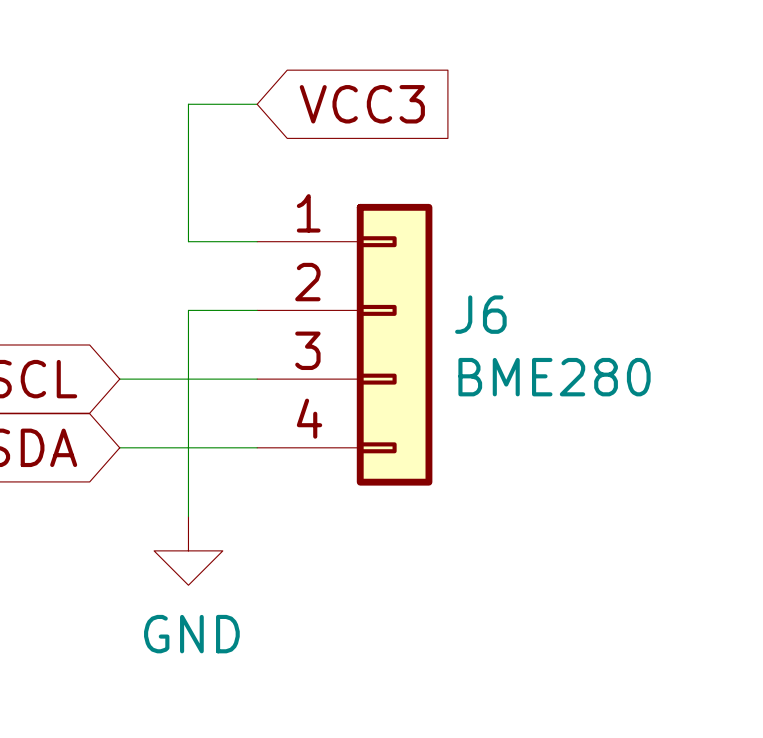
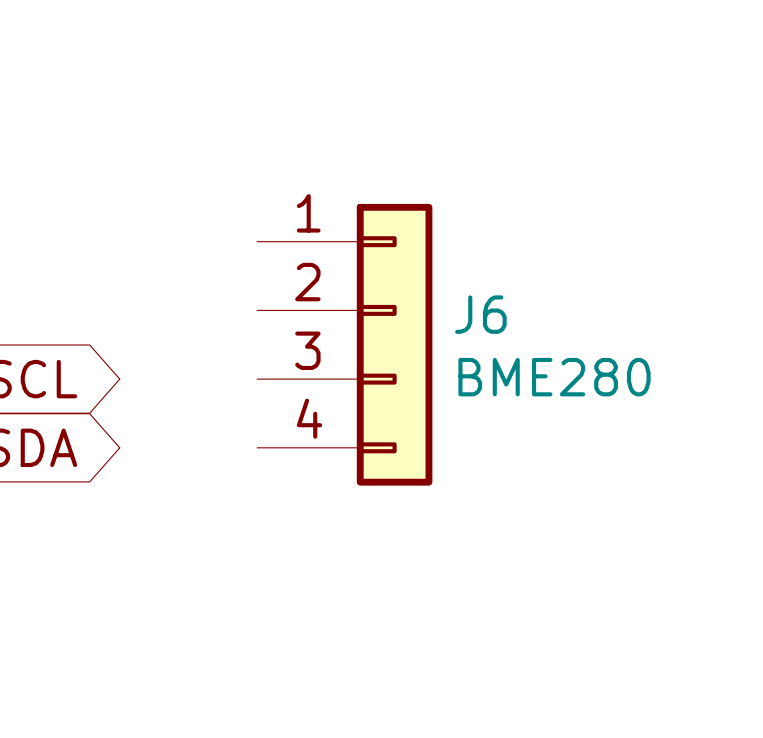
wire: (257, 104) (188, 104) (188, 241) (257, 241) -> none
global label: VCC3 (362, 104) -> none
wire: (257, 310) (188, 310) (188, 516) -> none
wire: (119, 379) (257, 379) -> none
wire: (119, 447) (257, 447) -> none
power symbol: GND (188, 550) -> none

